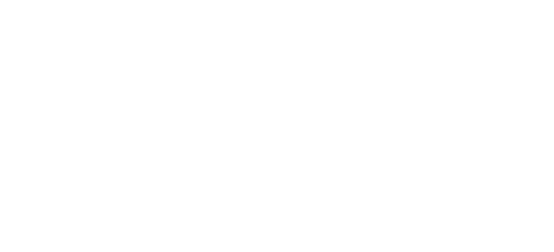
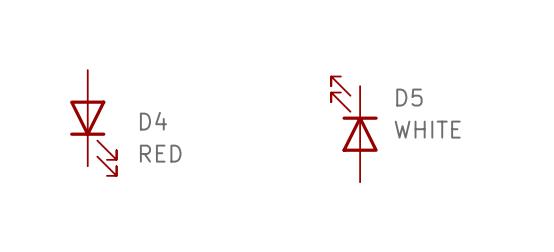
D4: none -> RED (93, 122)
D5: none -> WHITE (354, 129)

